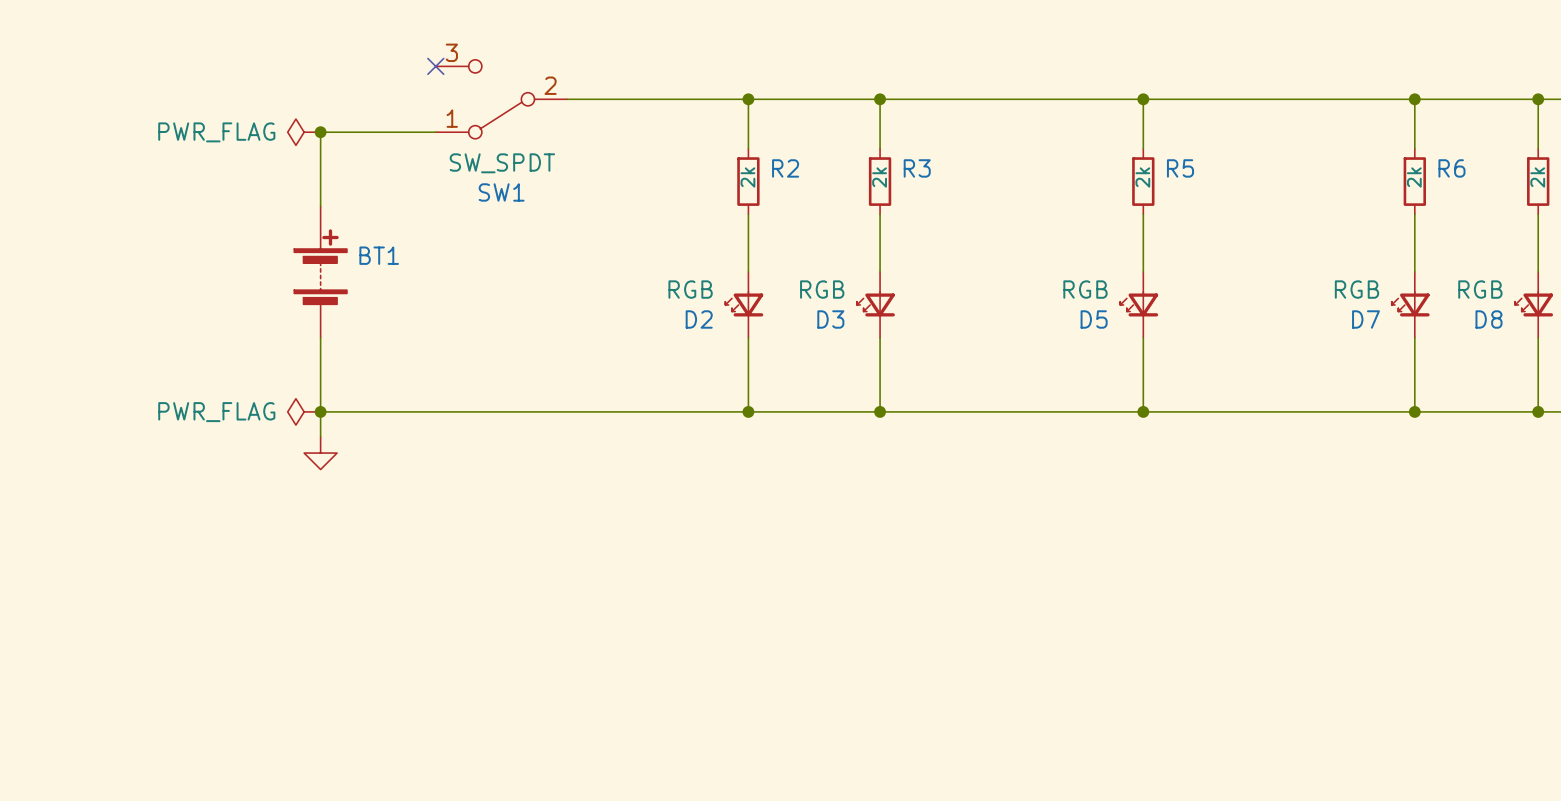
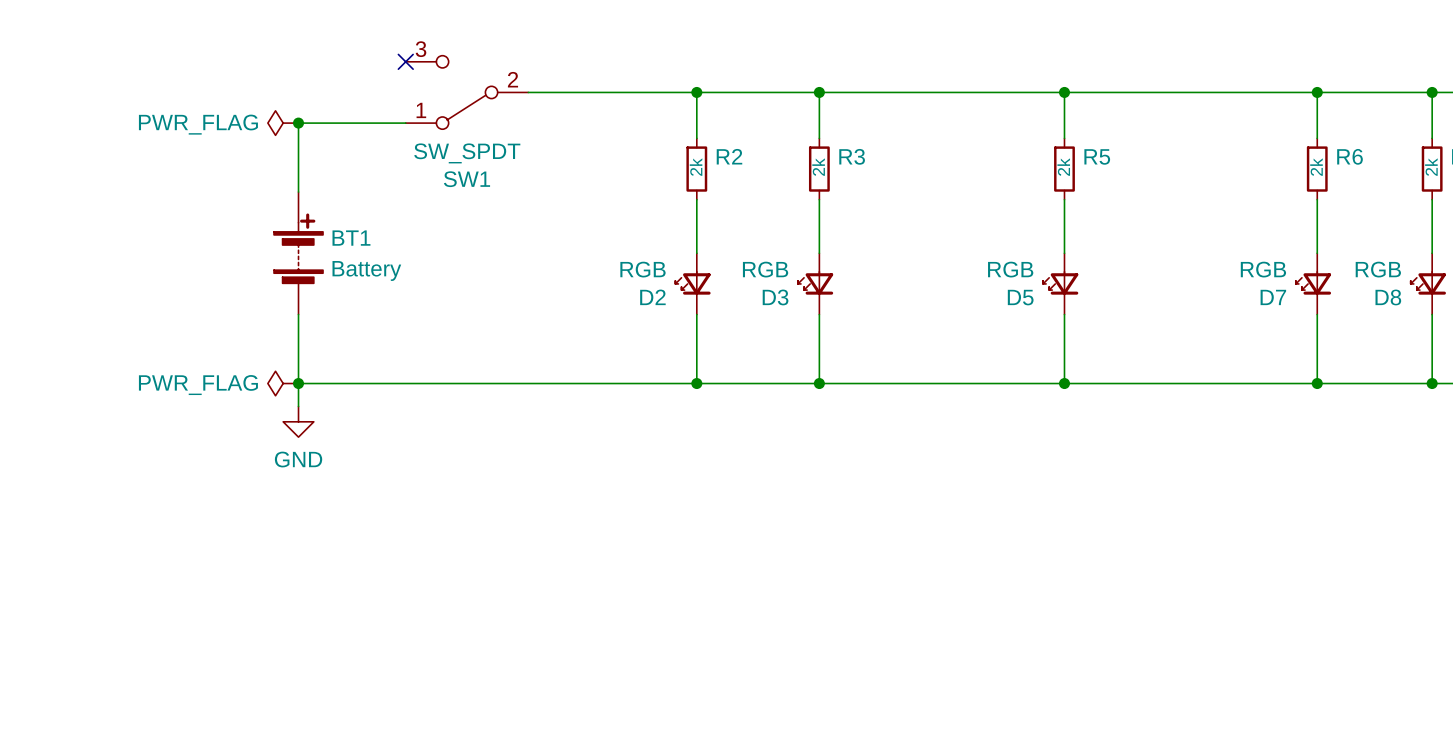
BT1 value: none -> Battery (366, 270)
power symbol text: none -> GND (298, 459)

